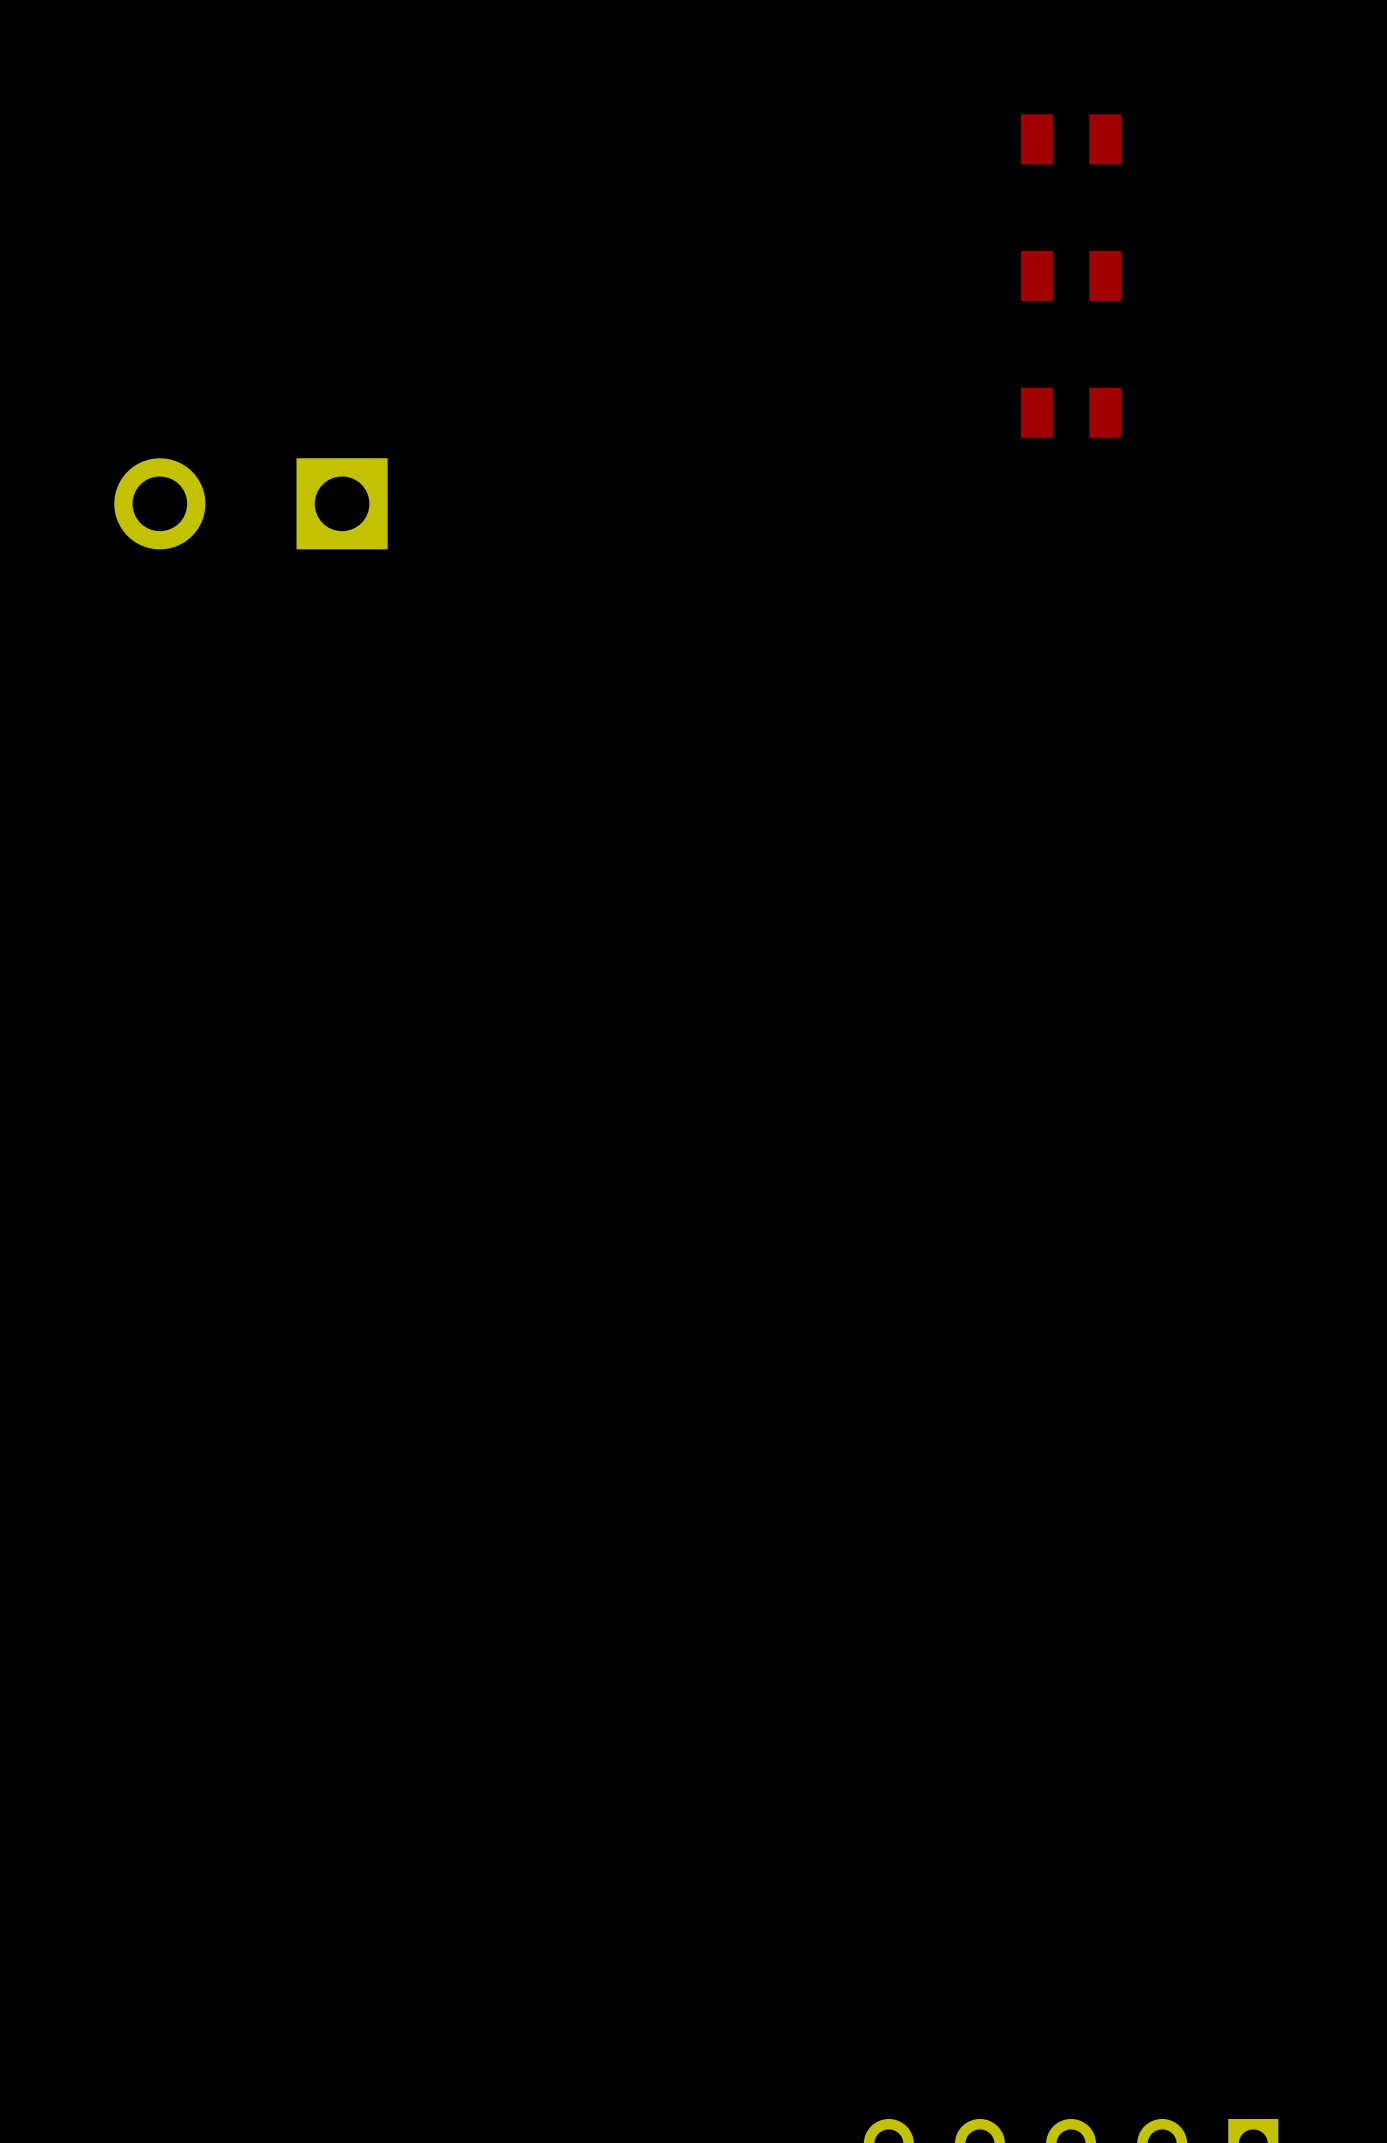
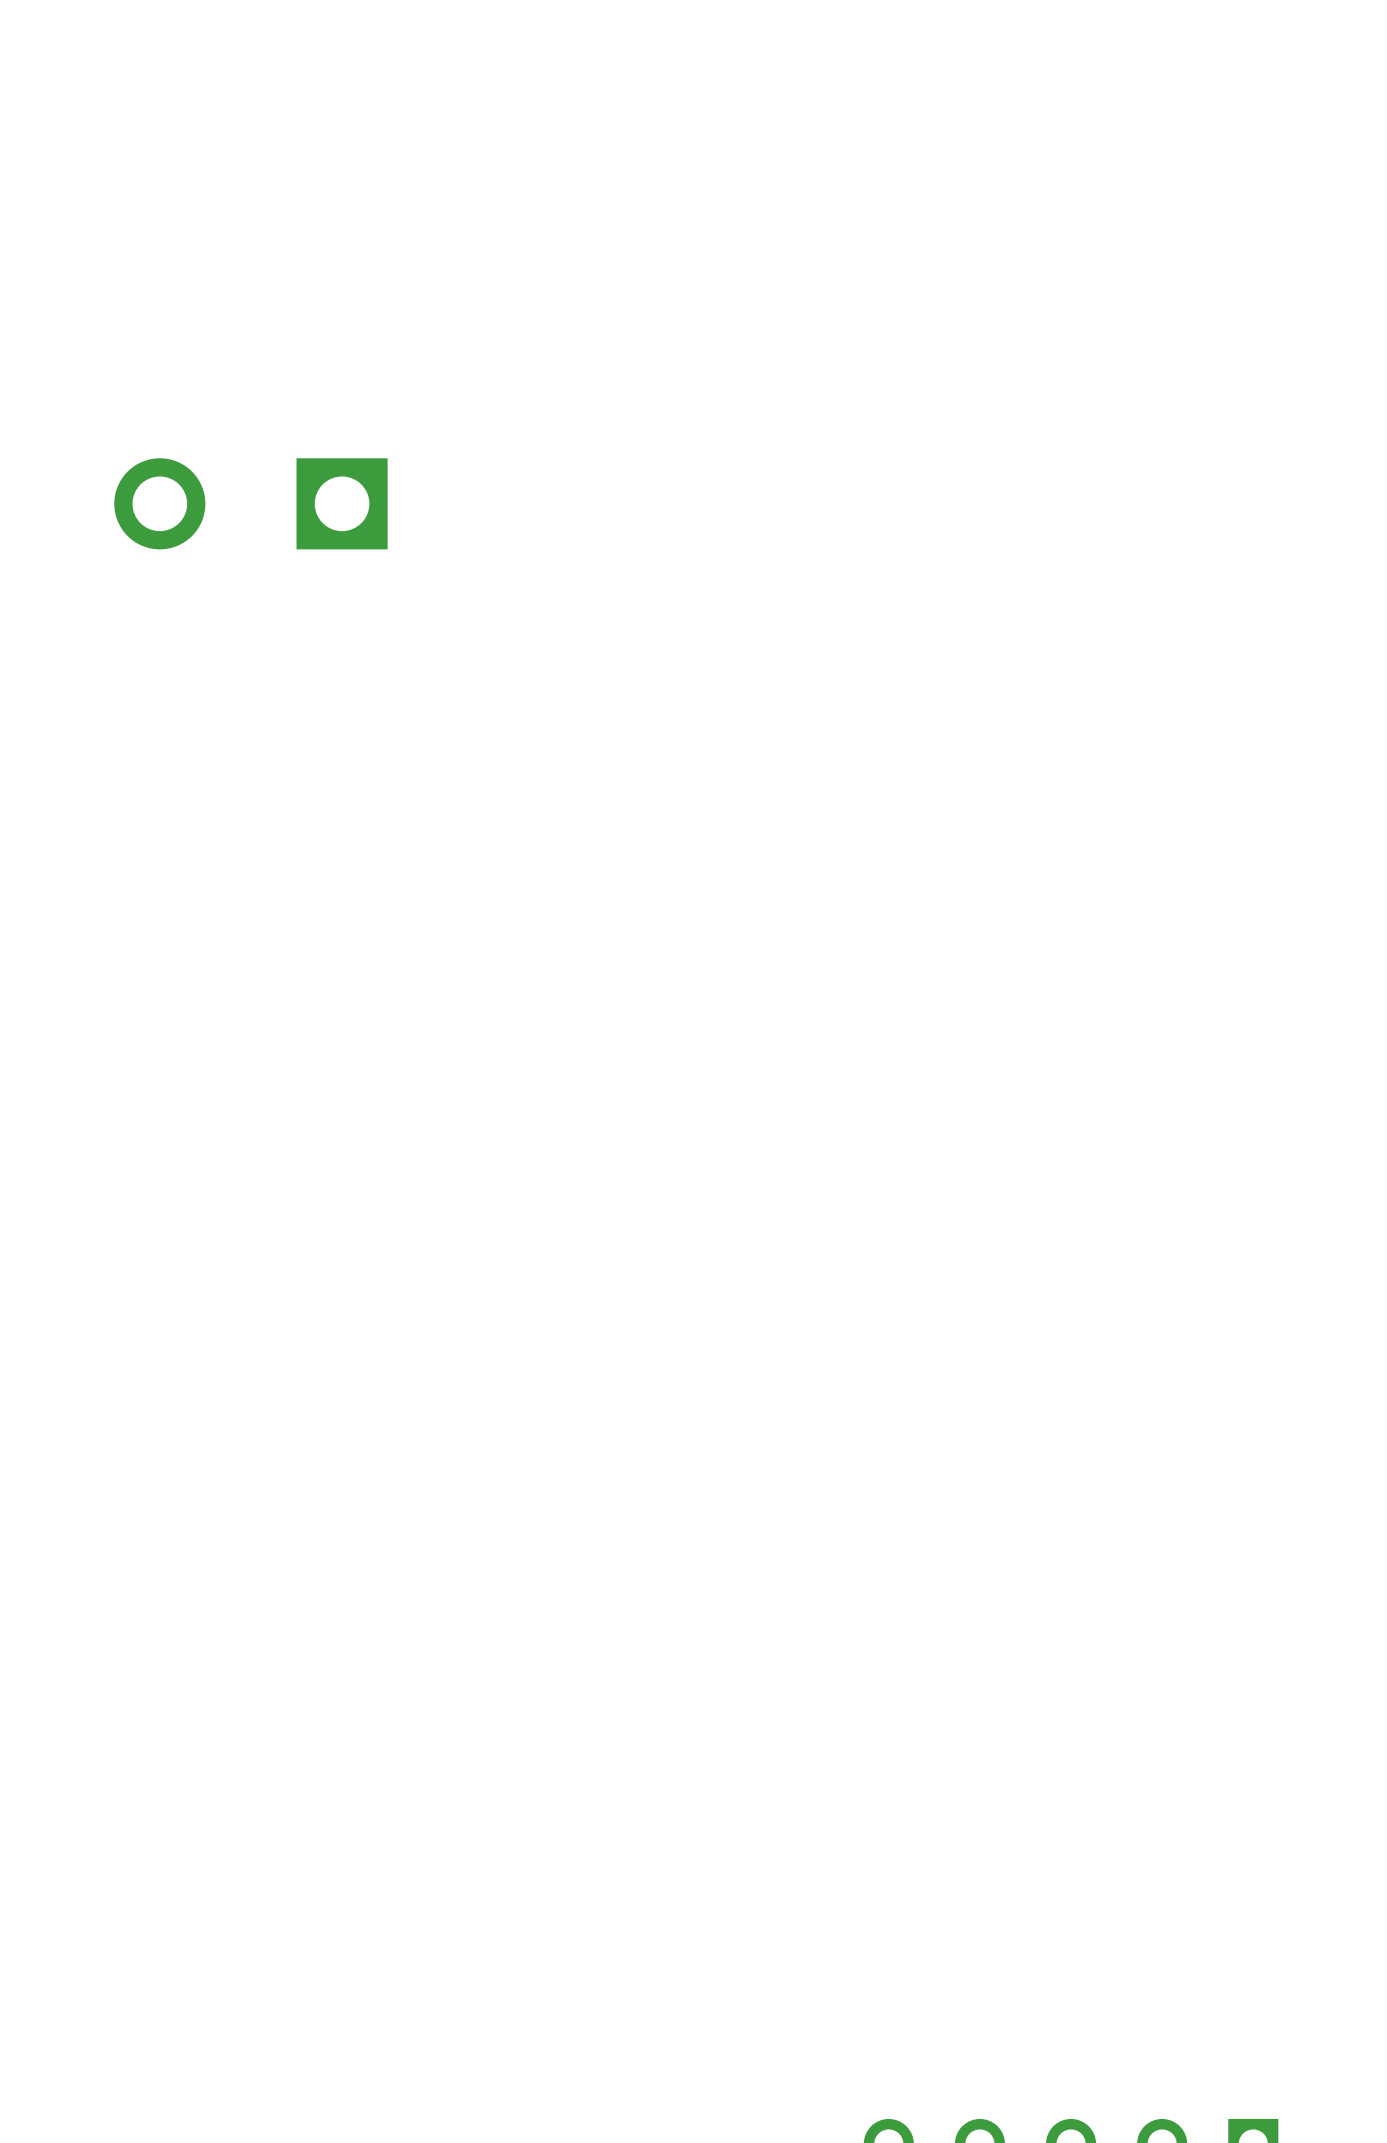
part: (1071, 139) -> none
part: (1071, 276) -> none
part: (1071, 412) -> none

